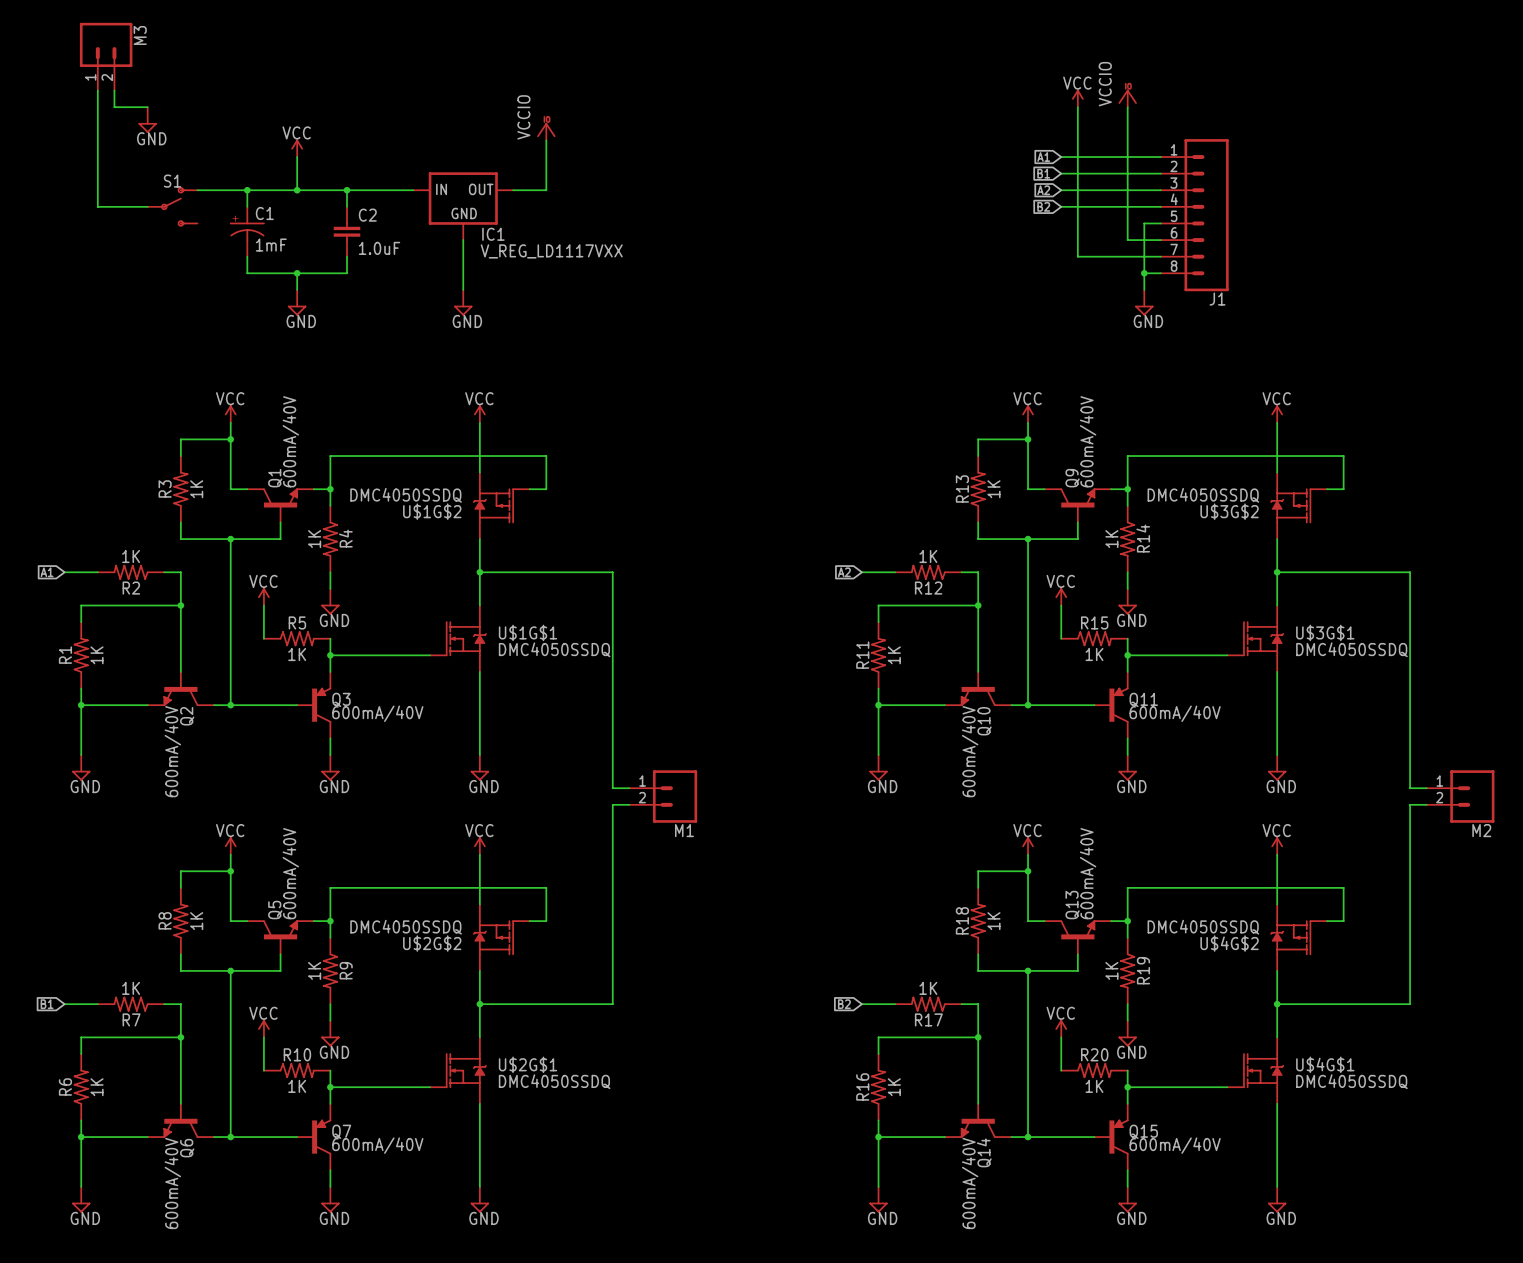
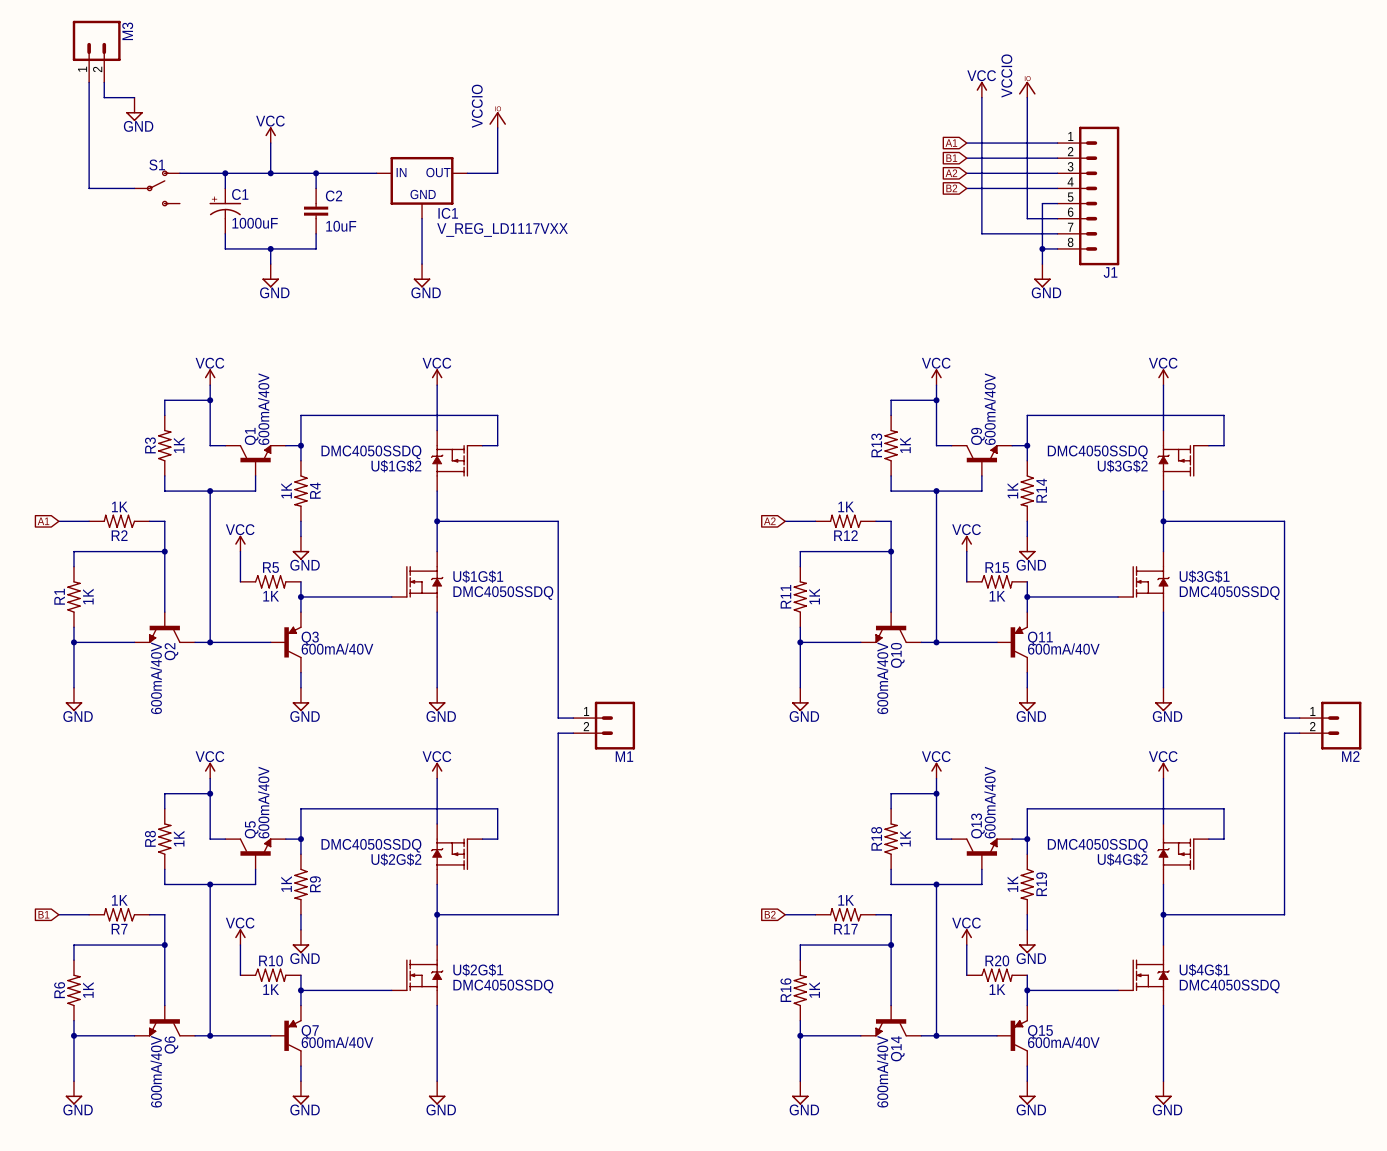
C1 value: 1mF (271, 245) -> 1000uF (255, 223)
C2 value: 1.0uF (379, 248) -> 10uF (341, 226)

